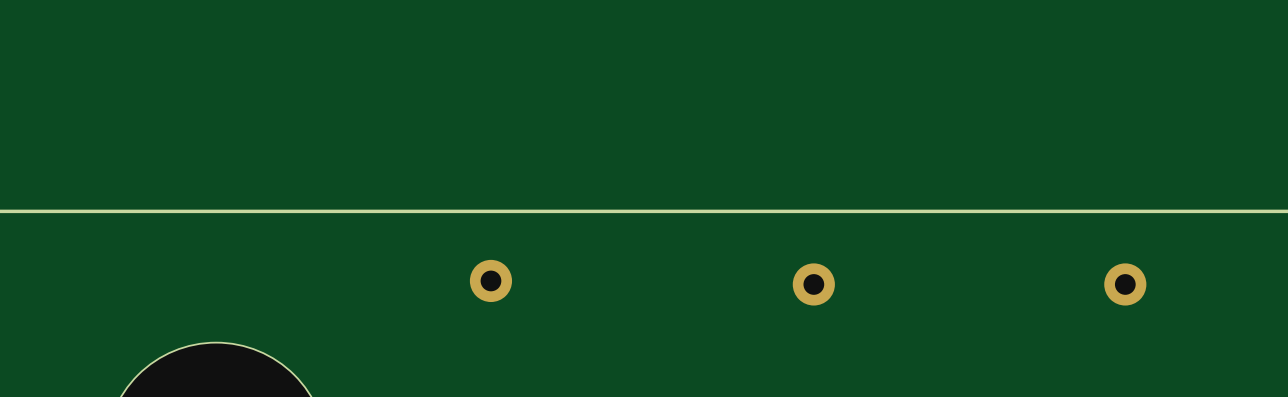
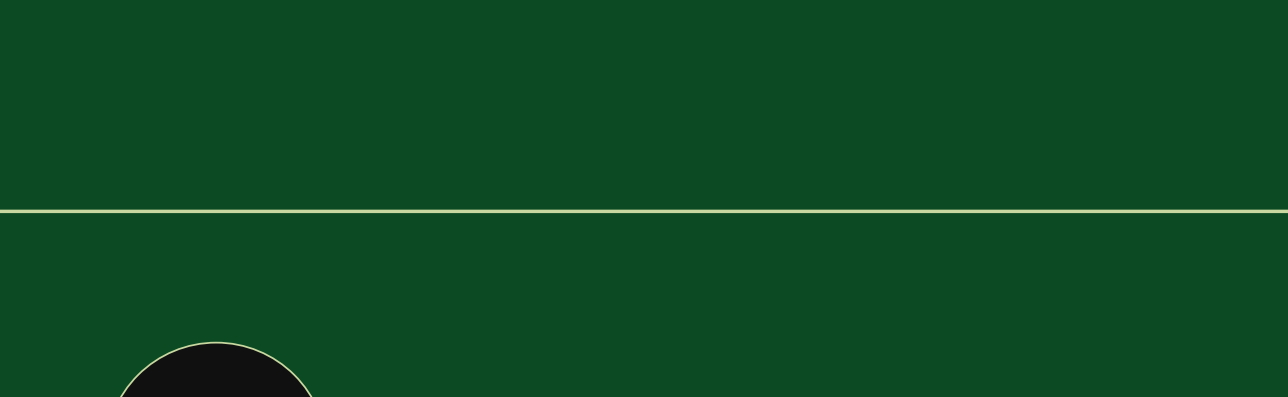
via: (490, 280) -> none
via: (813, 284) -> none
via: (1125, 284) -> none

